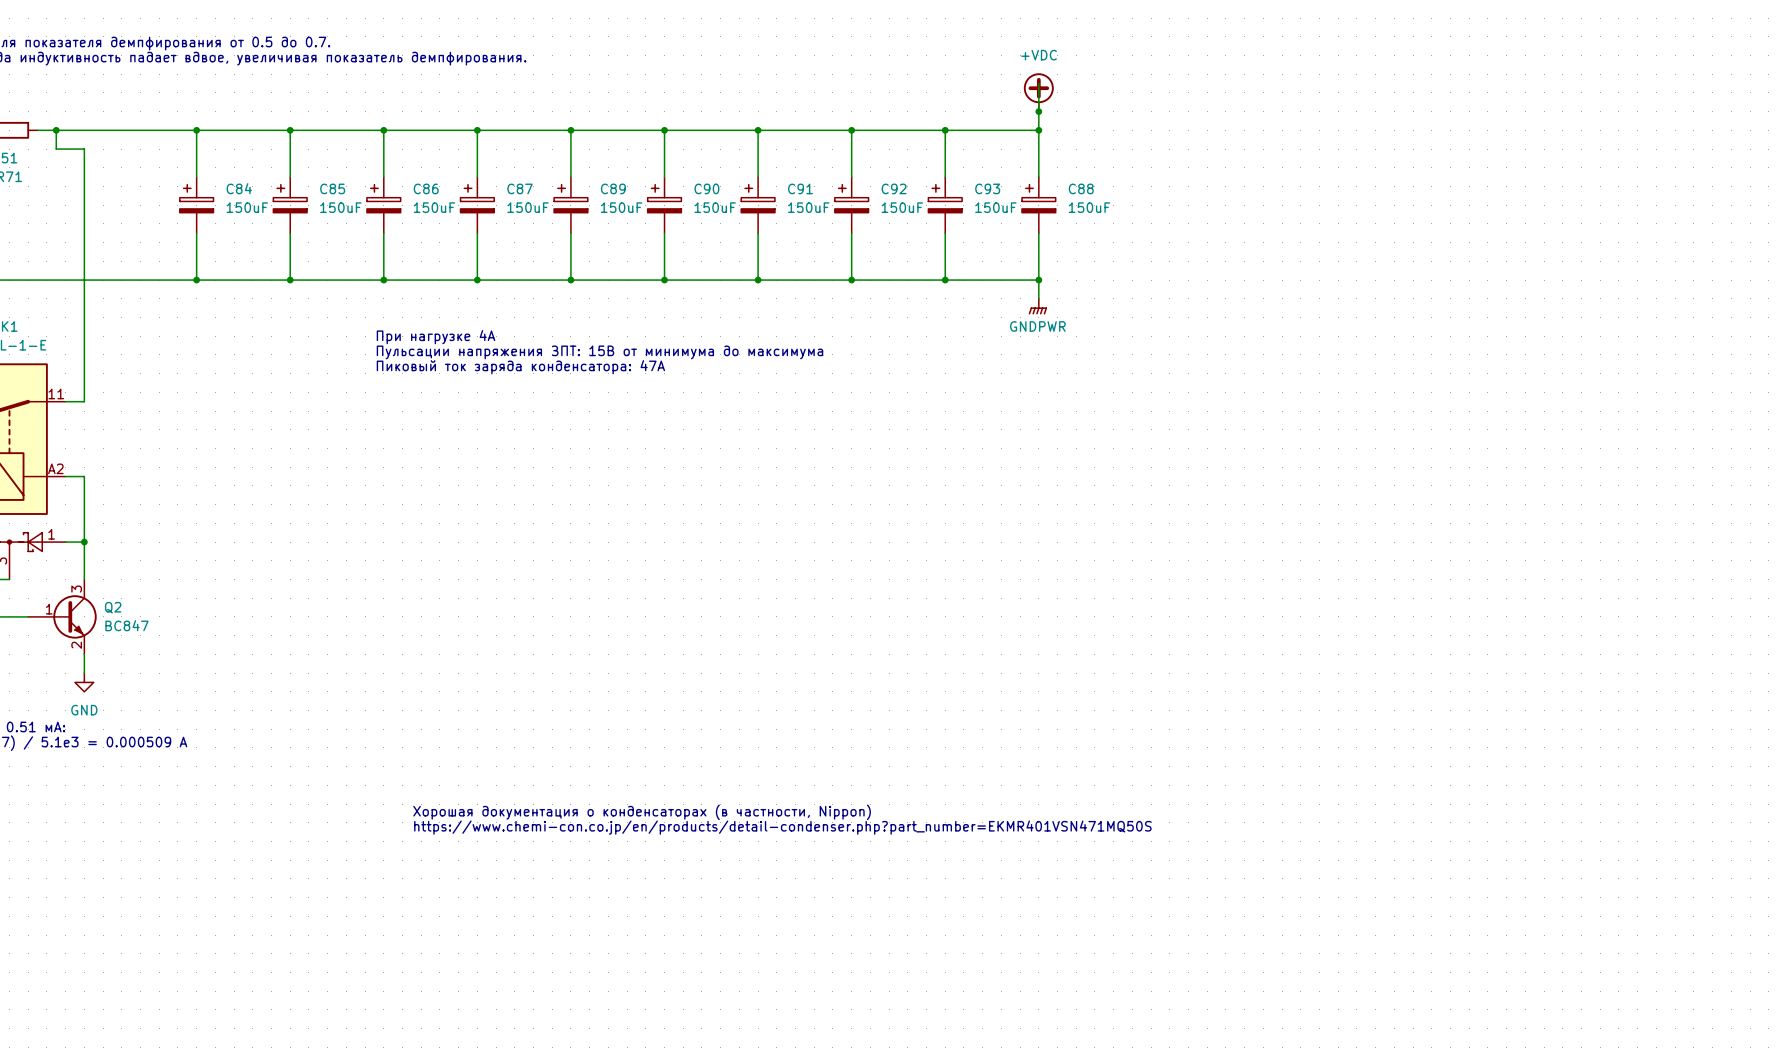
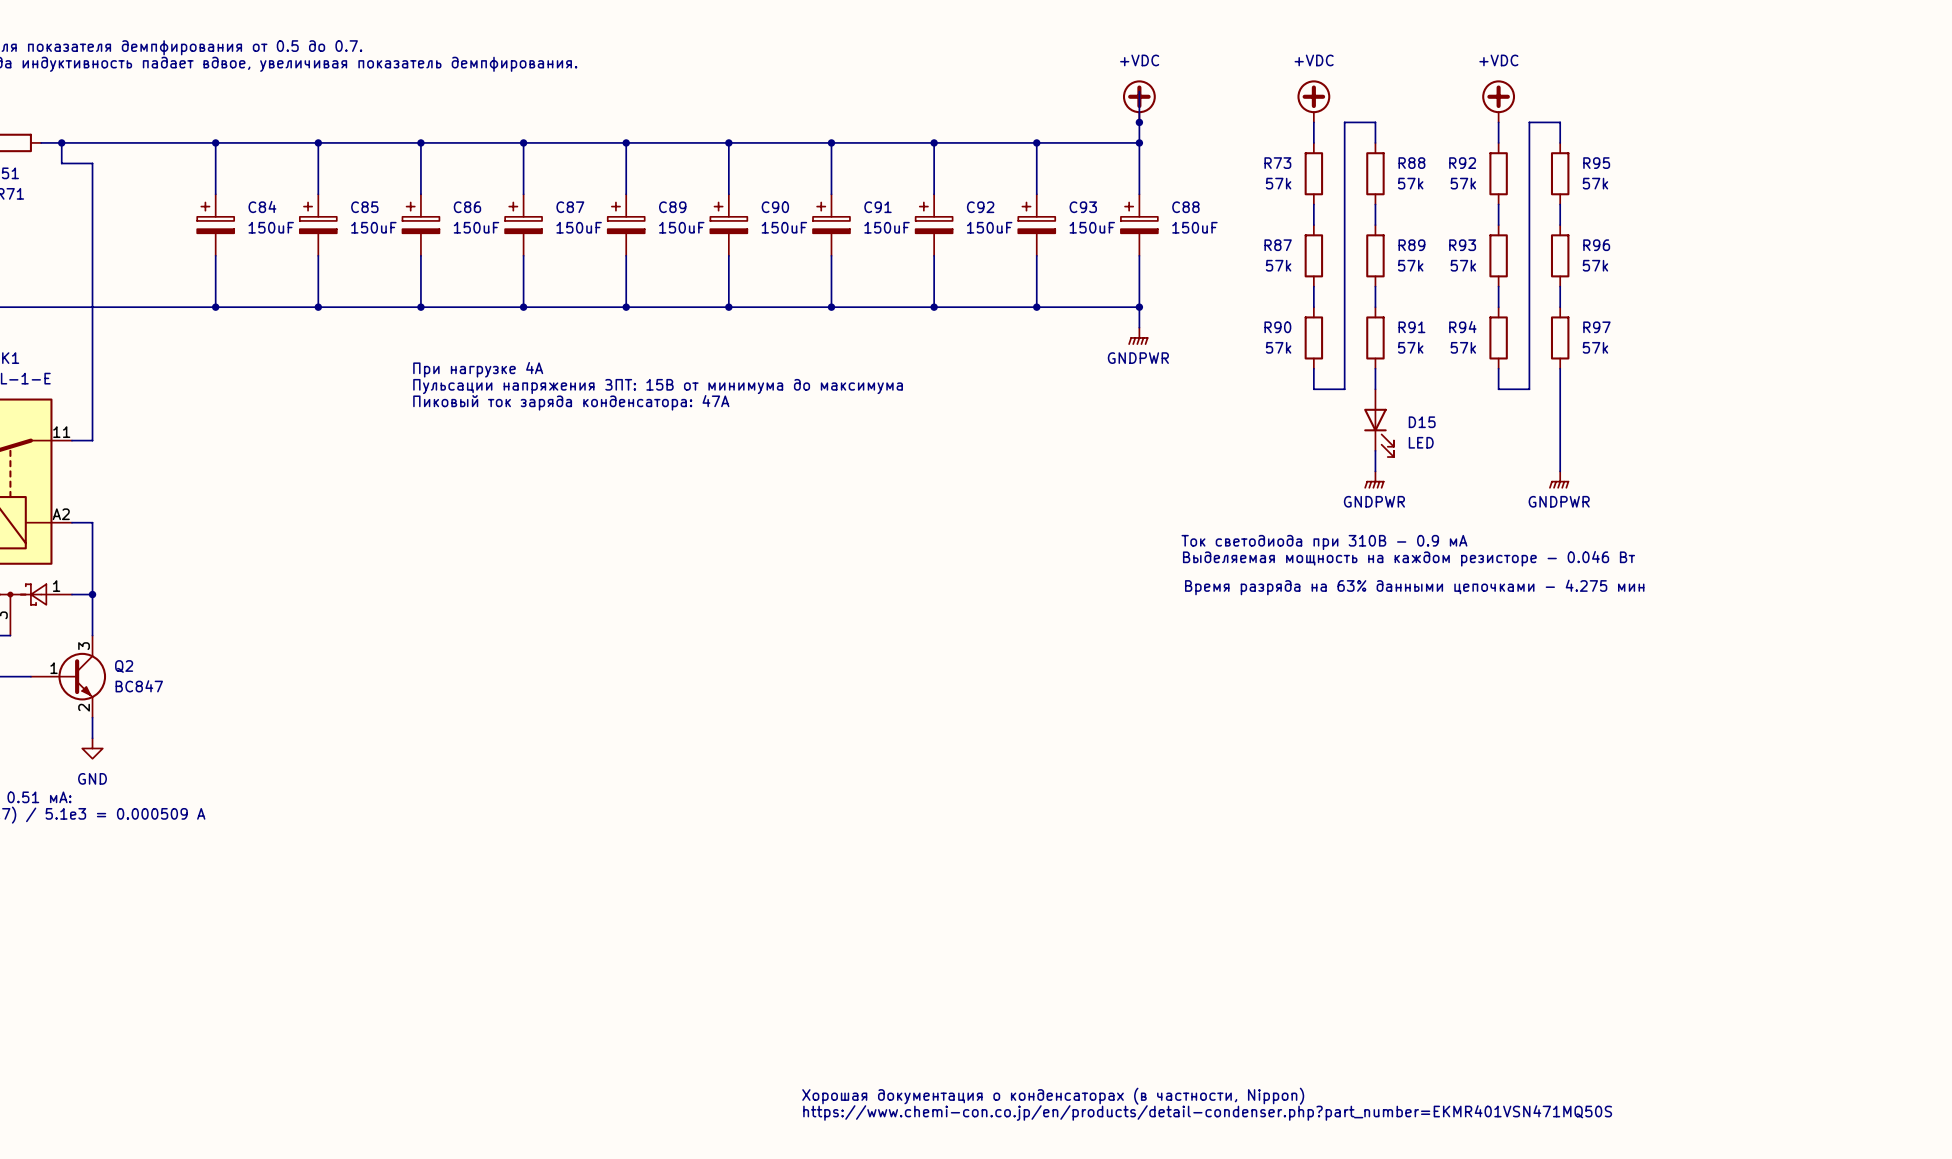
power symbol: none -> +VDC (1313, 101)
power symbol: none -> +VDC (1498, 101)
wire: none -> (1313, 122) (1313, 142)
wire: none -> (1498, 122) (1498, 142)
wire: none -> (1375, 142) (1375, 122) (1344, 122) (1344, 389) (1313, 389) (1313, 368)
wire: none -> (1560, 142) (1560, 122) (1529, 122) (1529, 389) (1498, 389) (1498, 368)
R73: none -> 57k (1313, 173)
R88: none -> 57k (1375, 173)
R92: none -> 57k (1498, 173)
R95: none -> 57k (1560, 173)
wire: none -> (1313, 204) (1313, 225)
wire: none -> (1375, 204) (1375, 225)
wire: none -> (1498, 204) (1498, 225)
wire: none -> (1560, 204) (1560, 225)
R87: none -> 57k (1313, 255)
R89: none -> 57k (1375, 255)
R93: none -> 57k (1498, 255)
R96: none -> 57k (1560, 255)
wire: none -> (1313, 286) (1313, 307)
wire: none -> (1375, 286) (1375, 307)
wire: none -> (1498, 286) (1498, 307)
wire: none -> (1560, 286) (1560, 307)
R90: none -> 57k (1313, 337)
R91: none -> 57k (1375, 337)
R94: none -> 57k (1498, 337)
R97: none -> 57k (1560, 337)
wire: none -> (1375, 368) (1375, 389)
wire: none -> (1560, 368) (1560, 471)
D15: none -> LED (1379, 423)
wire: none -> (1375, 450) (1375, 471)
power symbol: none -> GNDPWR (1374, 480)
power symbol: none -> GNDPWR (1559, 480)
text: none -> Ток светодиода при 310В - 0.9 мА (1324, 542)
text: none -> Выделяемая мощность на каждом резисторе - 0.046 Вт (1409, 558)
text: none -> Время разряда на 63% данными цепочками - 4.275 мин (1414, 587)
text: Хорошая документация о конденсаторах (в частности, Nippon) (642, 812) -> none
text: https://www.chemi-con.co.jp/en/products/detail-condenser.php?part_number=EKMR401VSN471MQ50S (782, 827) -> none
text: none -> Хорошая документация о конденсаторах (в частности, Nippon) (1053, 1096)
text: none -> https://www.chemi-con.co.jp/en/products/detail-condenser.php?part_number=EKMR401VSN471MQ50S (1207, 1112)

